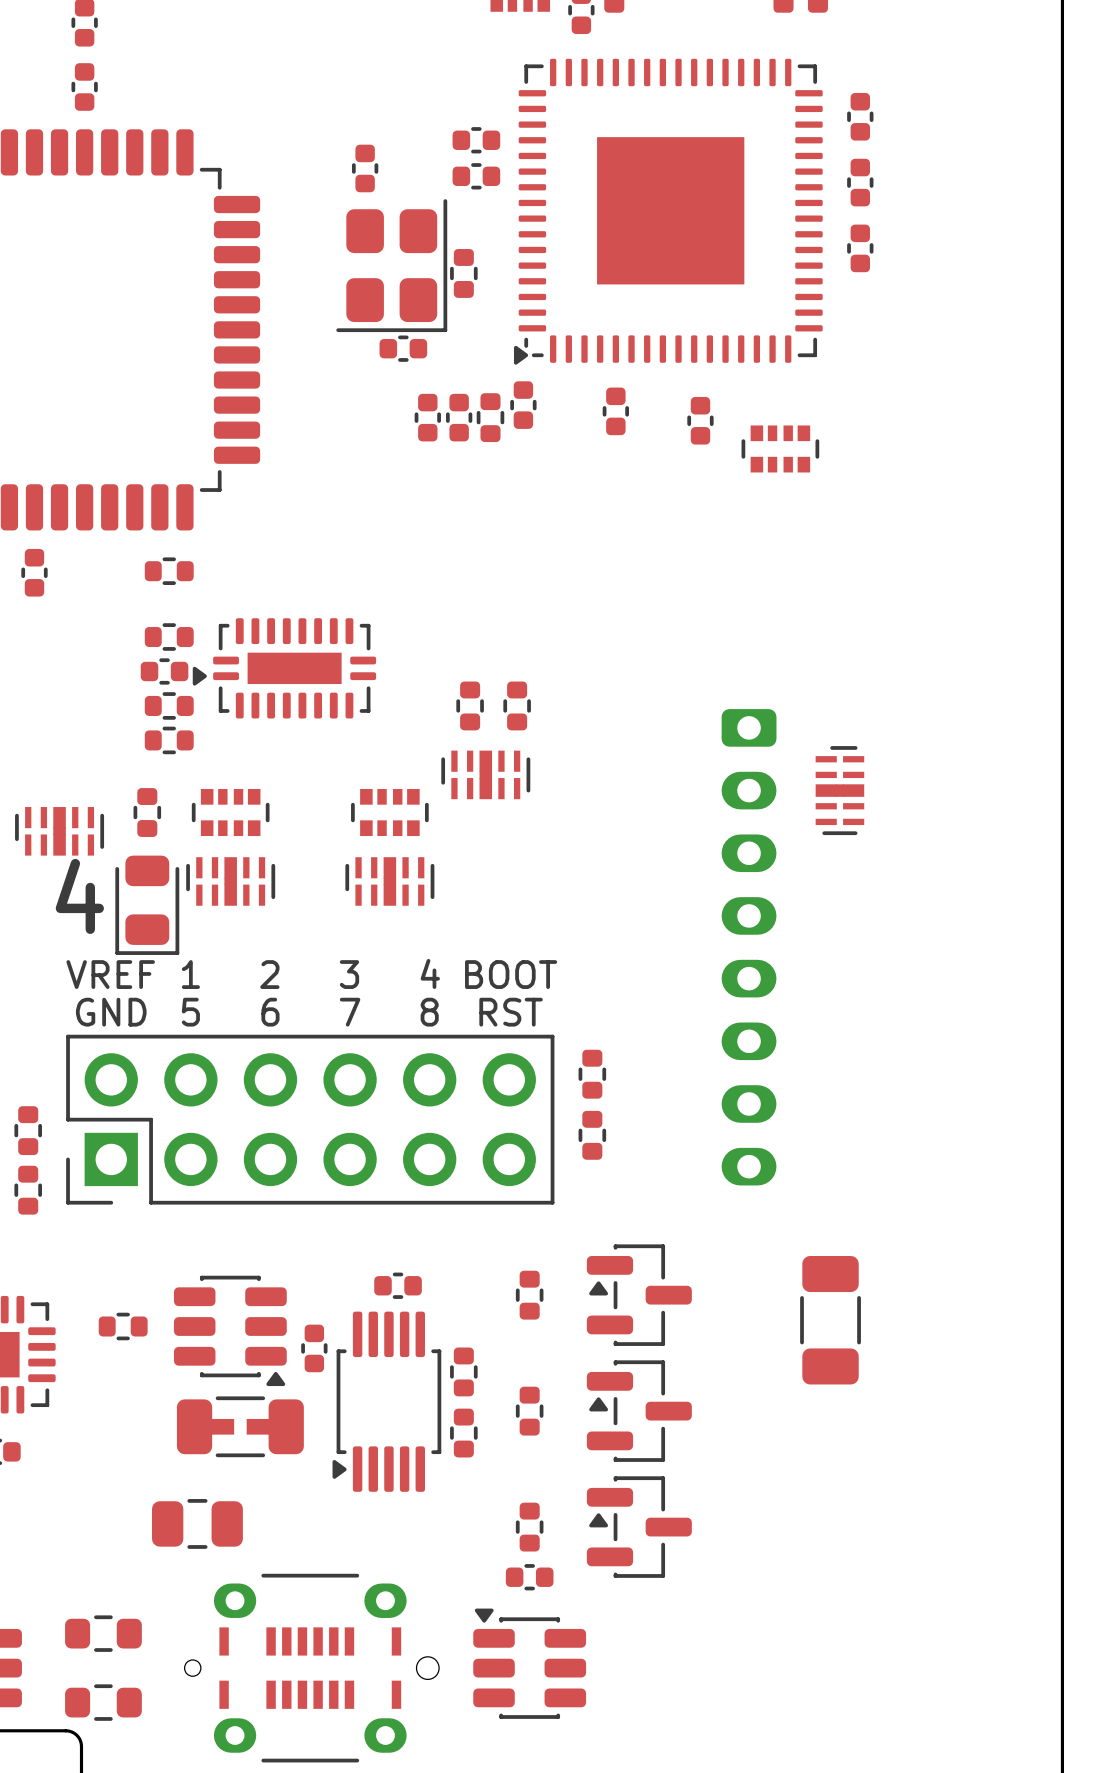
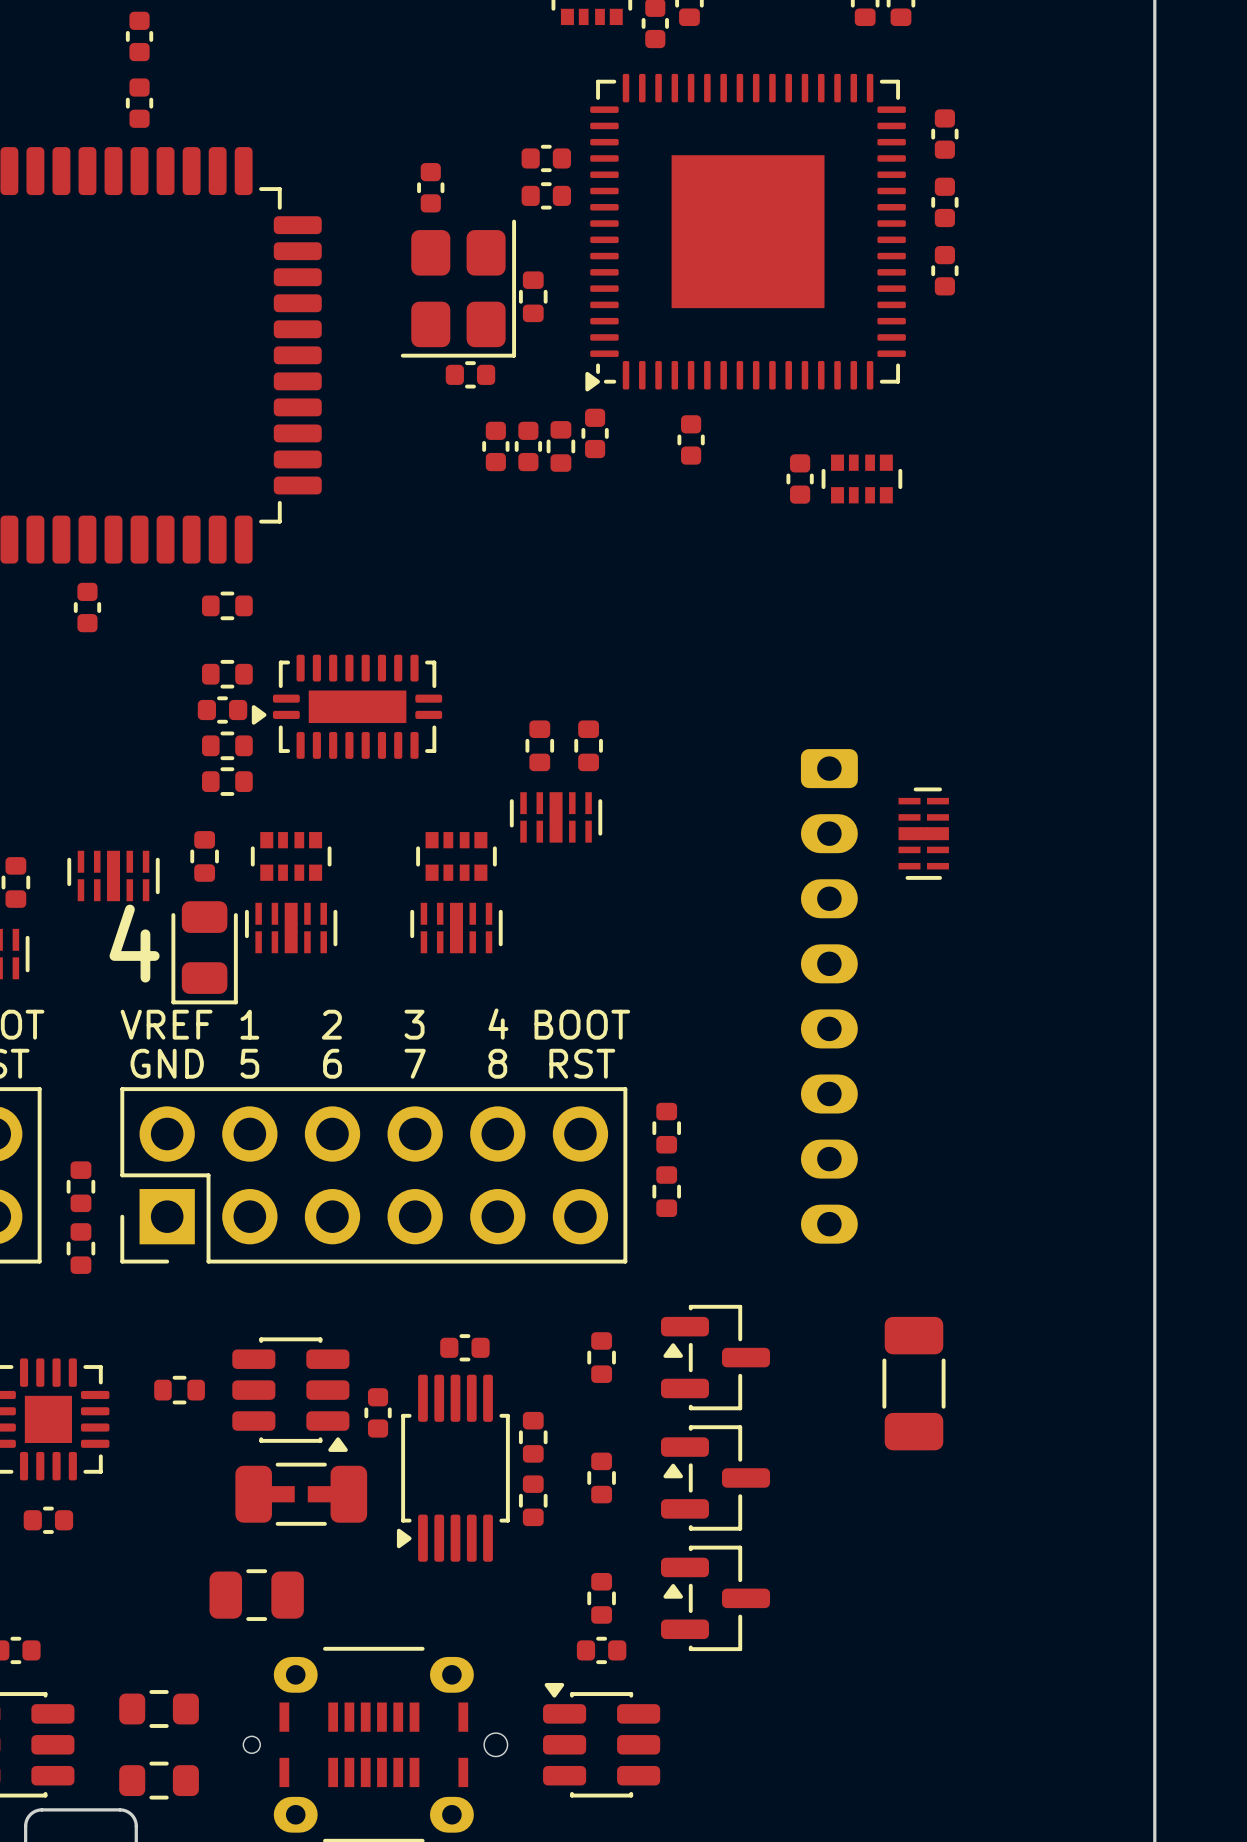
part position: (700, 420) -> (800, 478)

